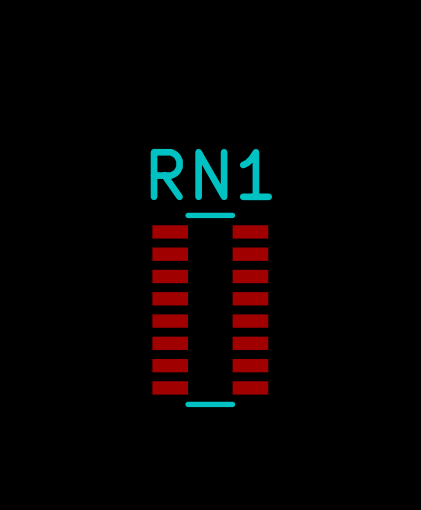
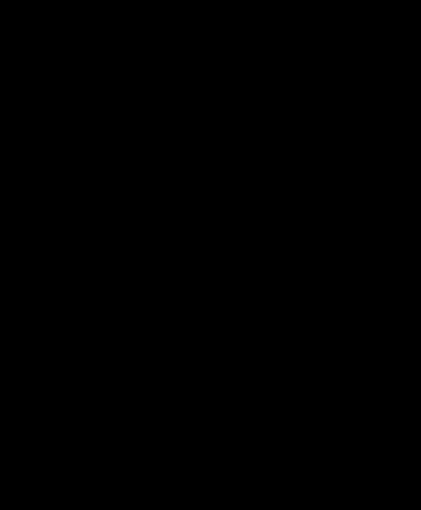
RN1: (210, 309) -> none

